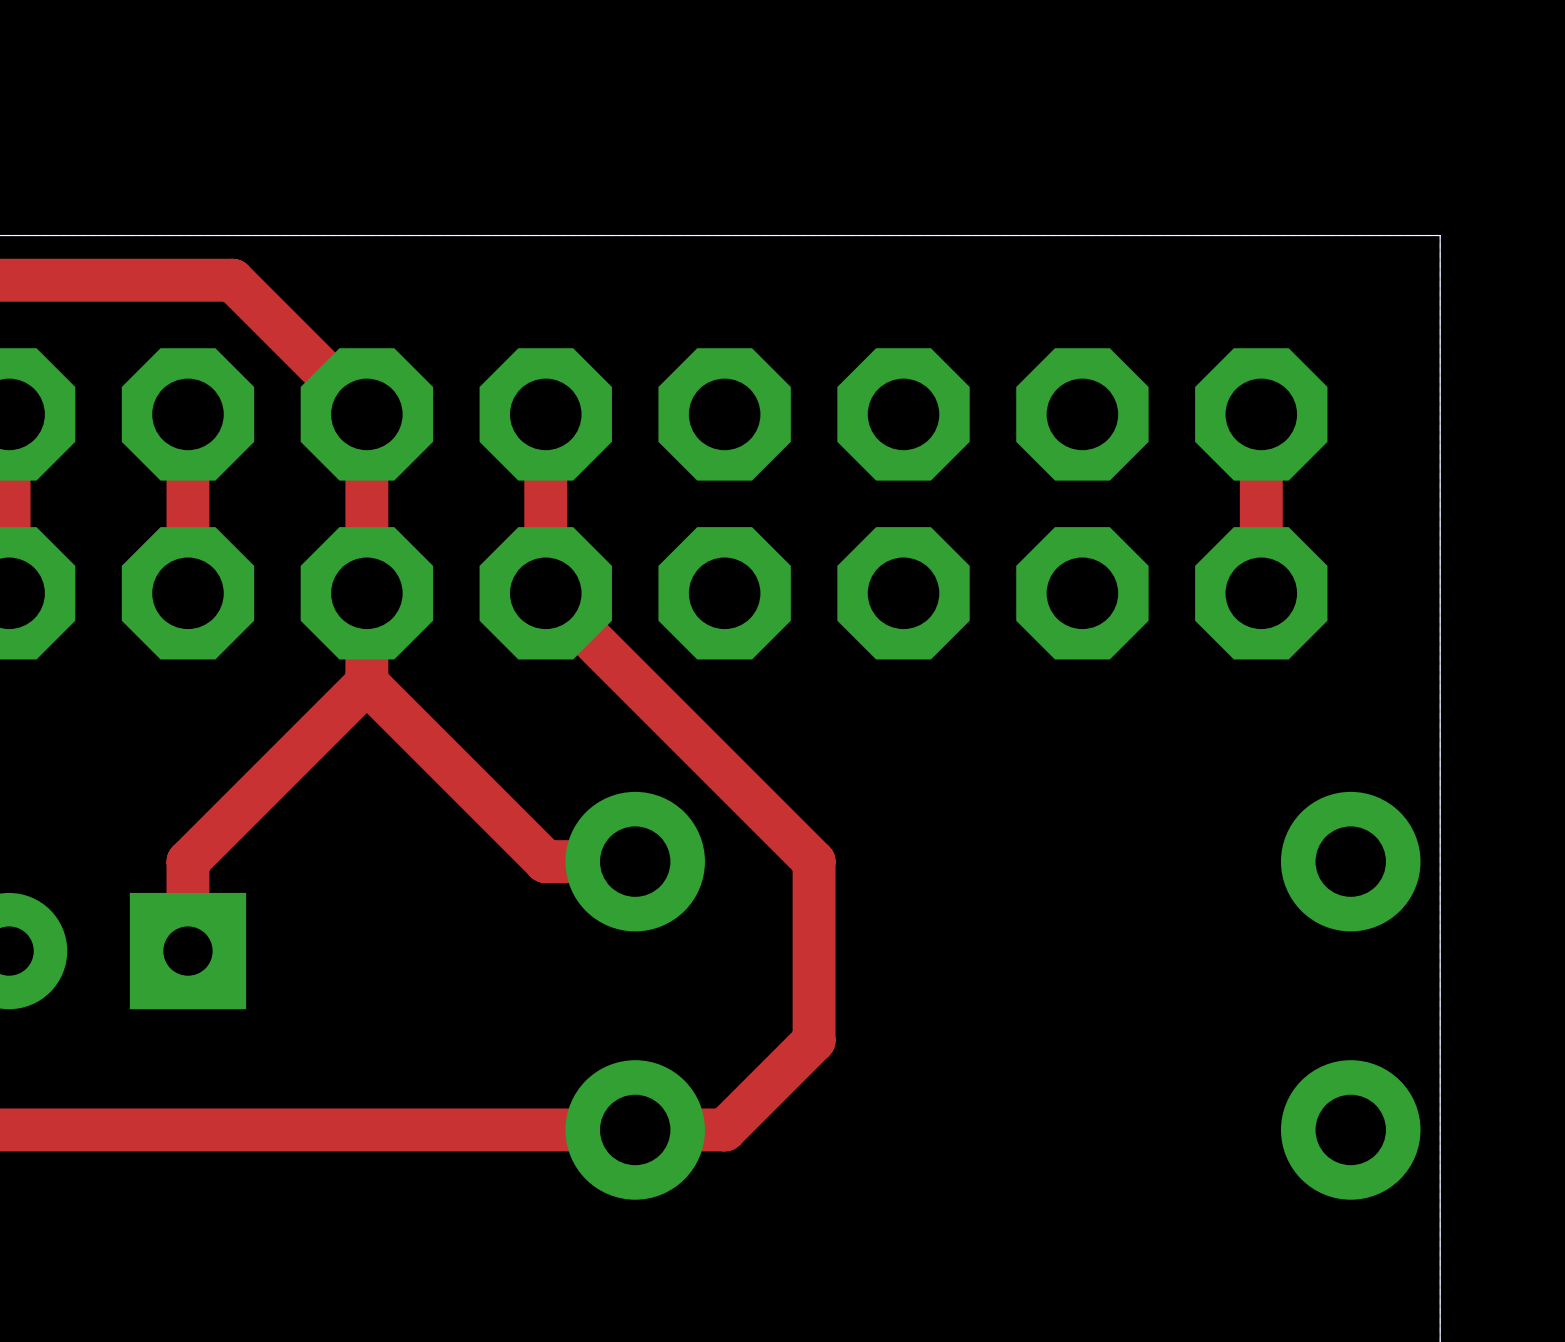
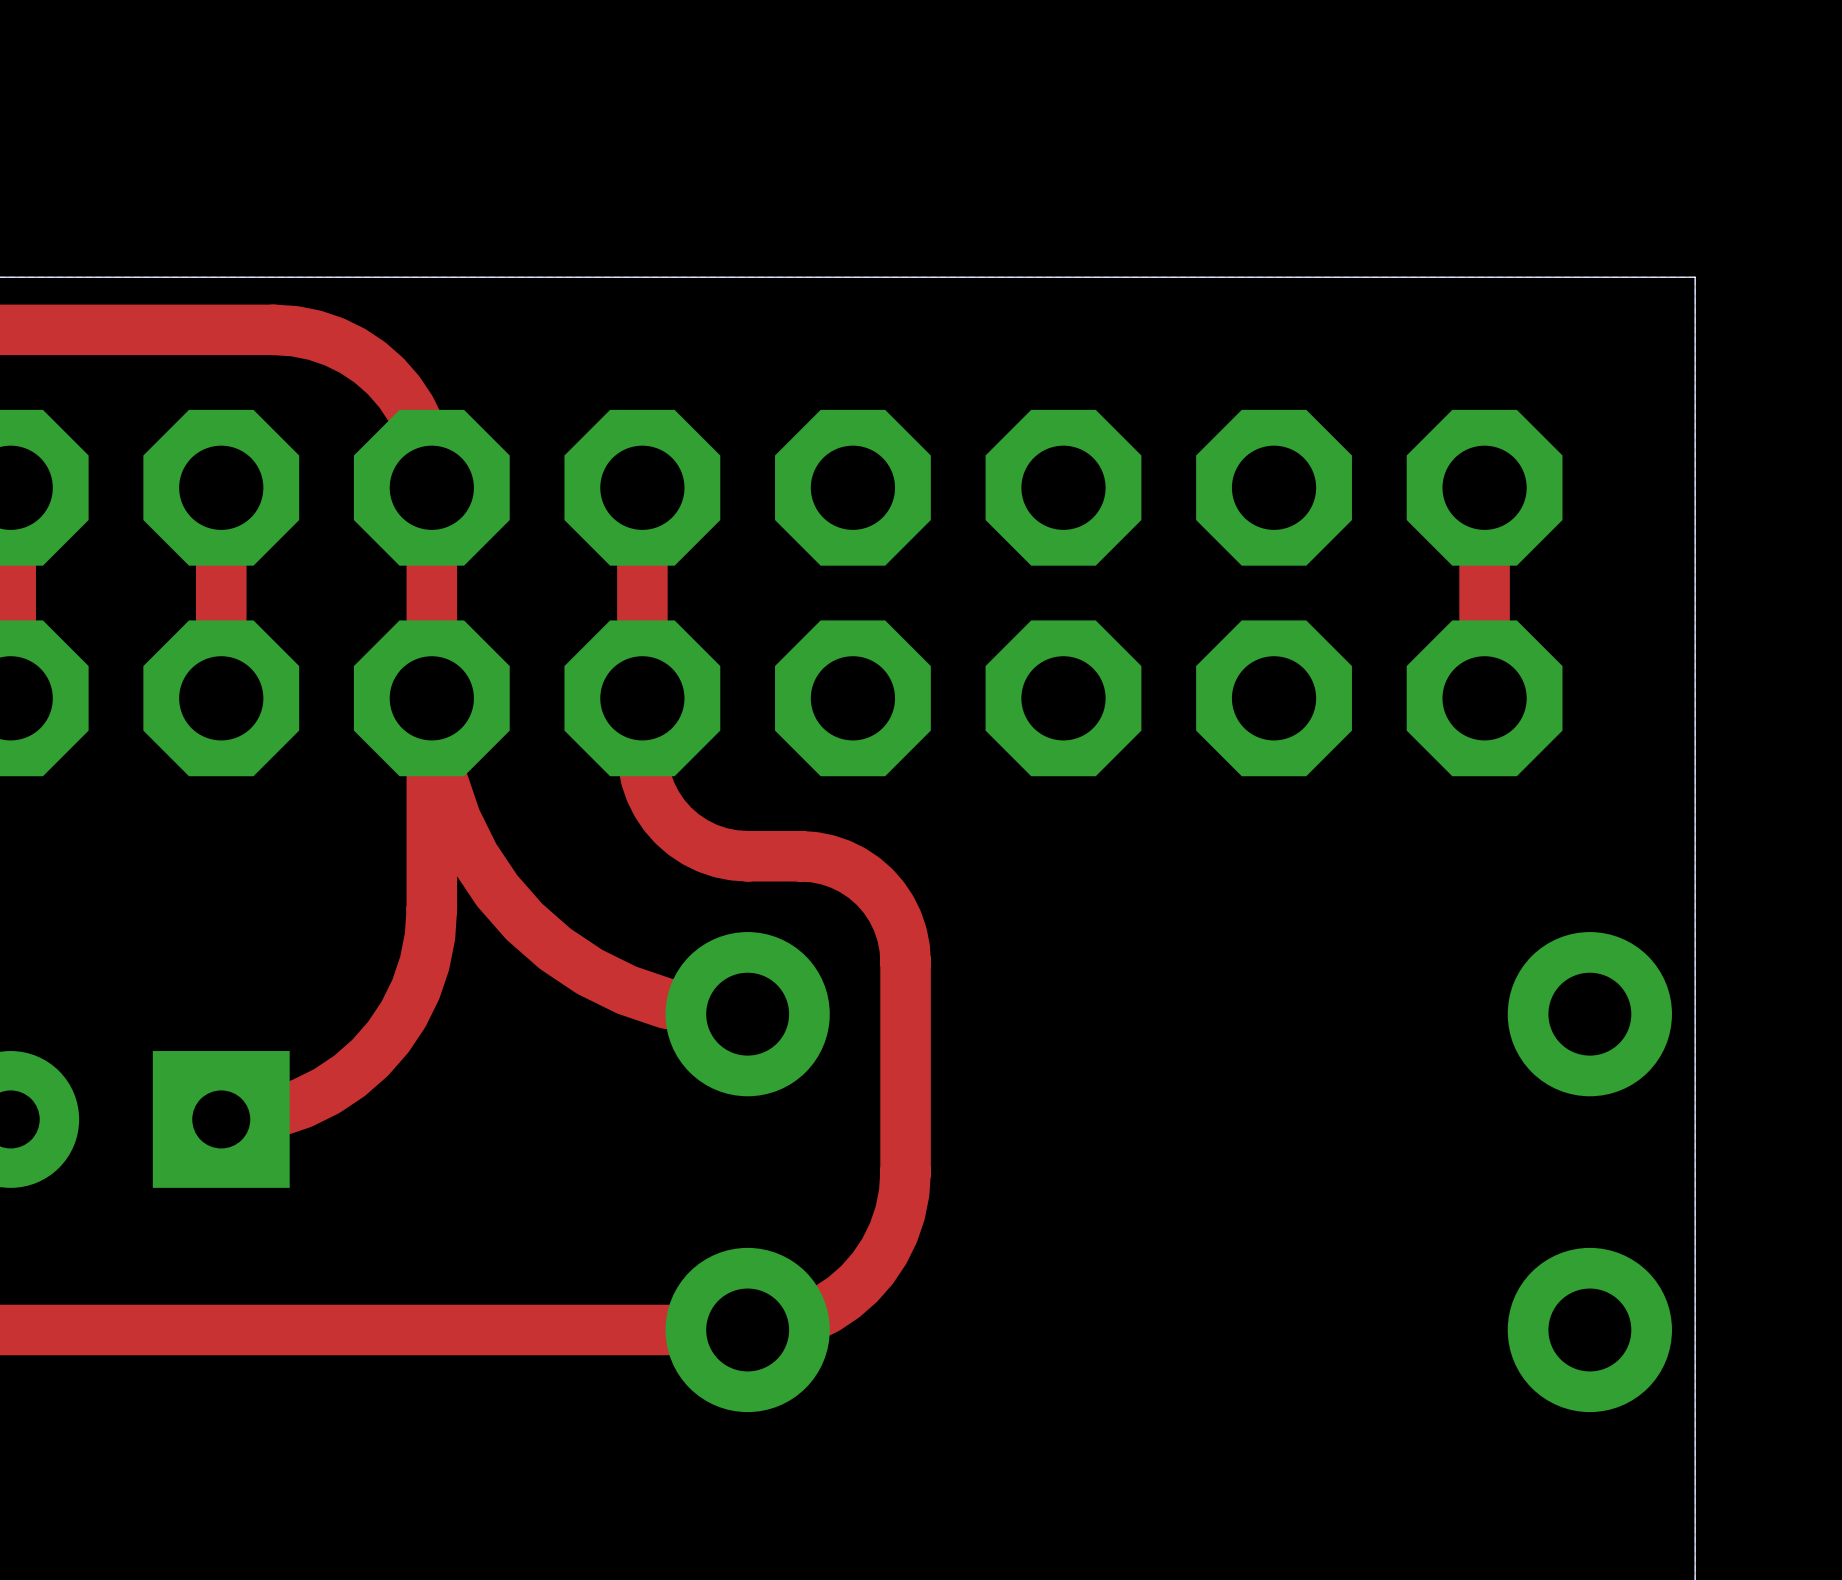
top track: (232, 280) (366, 414) -> (273, 329) (314, 335) (334, 341) (370, 362) (385, 376) (410, 408) (419, 427) (430, 467) (431, 487)
top track: none -> (431, 698) (434, 739) (442, 780) (455, 819) (474, 856) (497, 890) (524, 921) (555, 948) (589, 971) (626, 990) (665, 1003) (706, 1011) (747, 1014)
top track: (545, 593) (814, 861) (814, 1040) (724, 1129) (635, 1129) -> (642, 698) (642, 750) (645, 778) (656, 803) (673, 825) (695, 842) (720, 852) (747, 856) (814, 857) (840, 864) (852, 870) (874, 887) (883, 897) (897, 921) (904, 947) (905, 1172) (900, 1212) (893, 1232) (872, 1268) (843, 1297) (808, 1317) (788, 1324) (747, 1329)
top track: (635, 861) (545, 861) (366, 682) (187, 861) (187, 951) -> (431, 803) (430, 936) (424, 963) (415, 989) (403, 1014) (388, 1037) (370, 1057) (349, 1075) (326, 1091) (301, 1103) (275, 1112) (248, 1117) (221, 1119)

